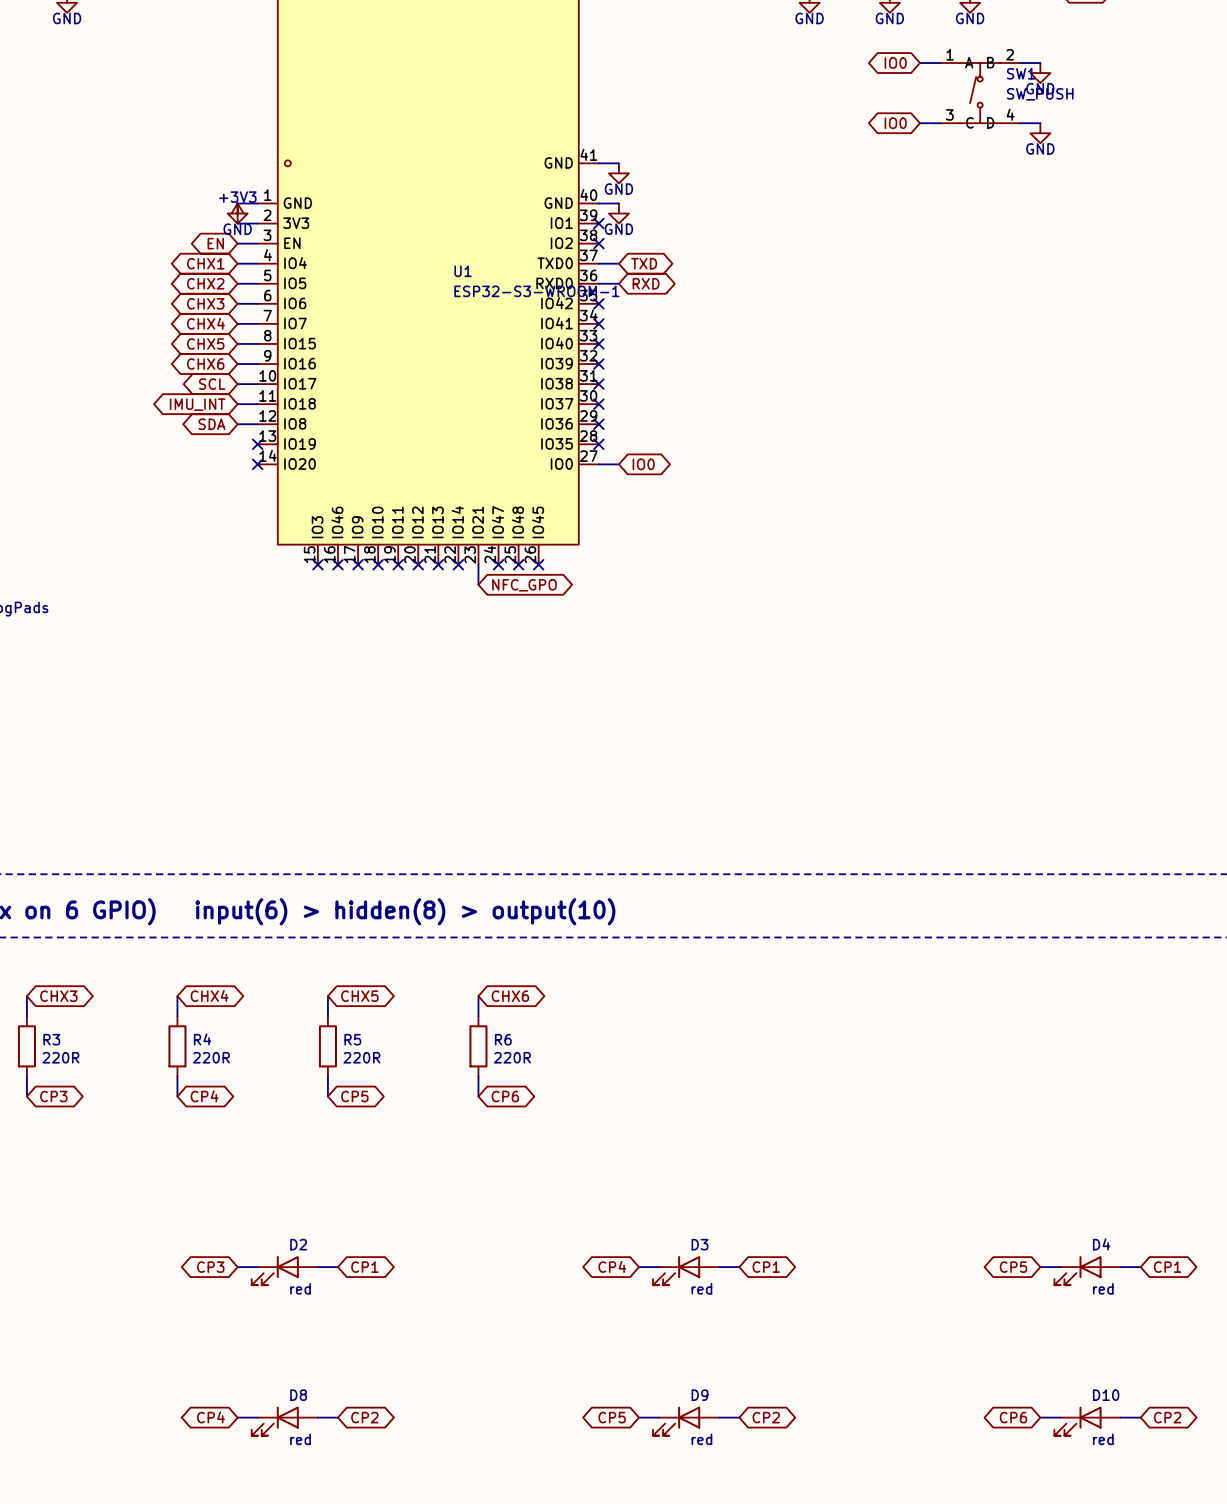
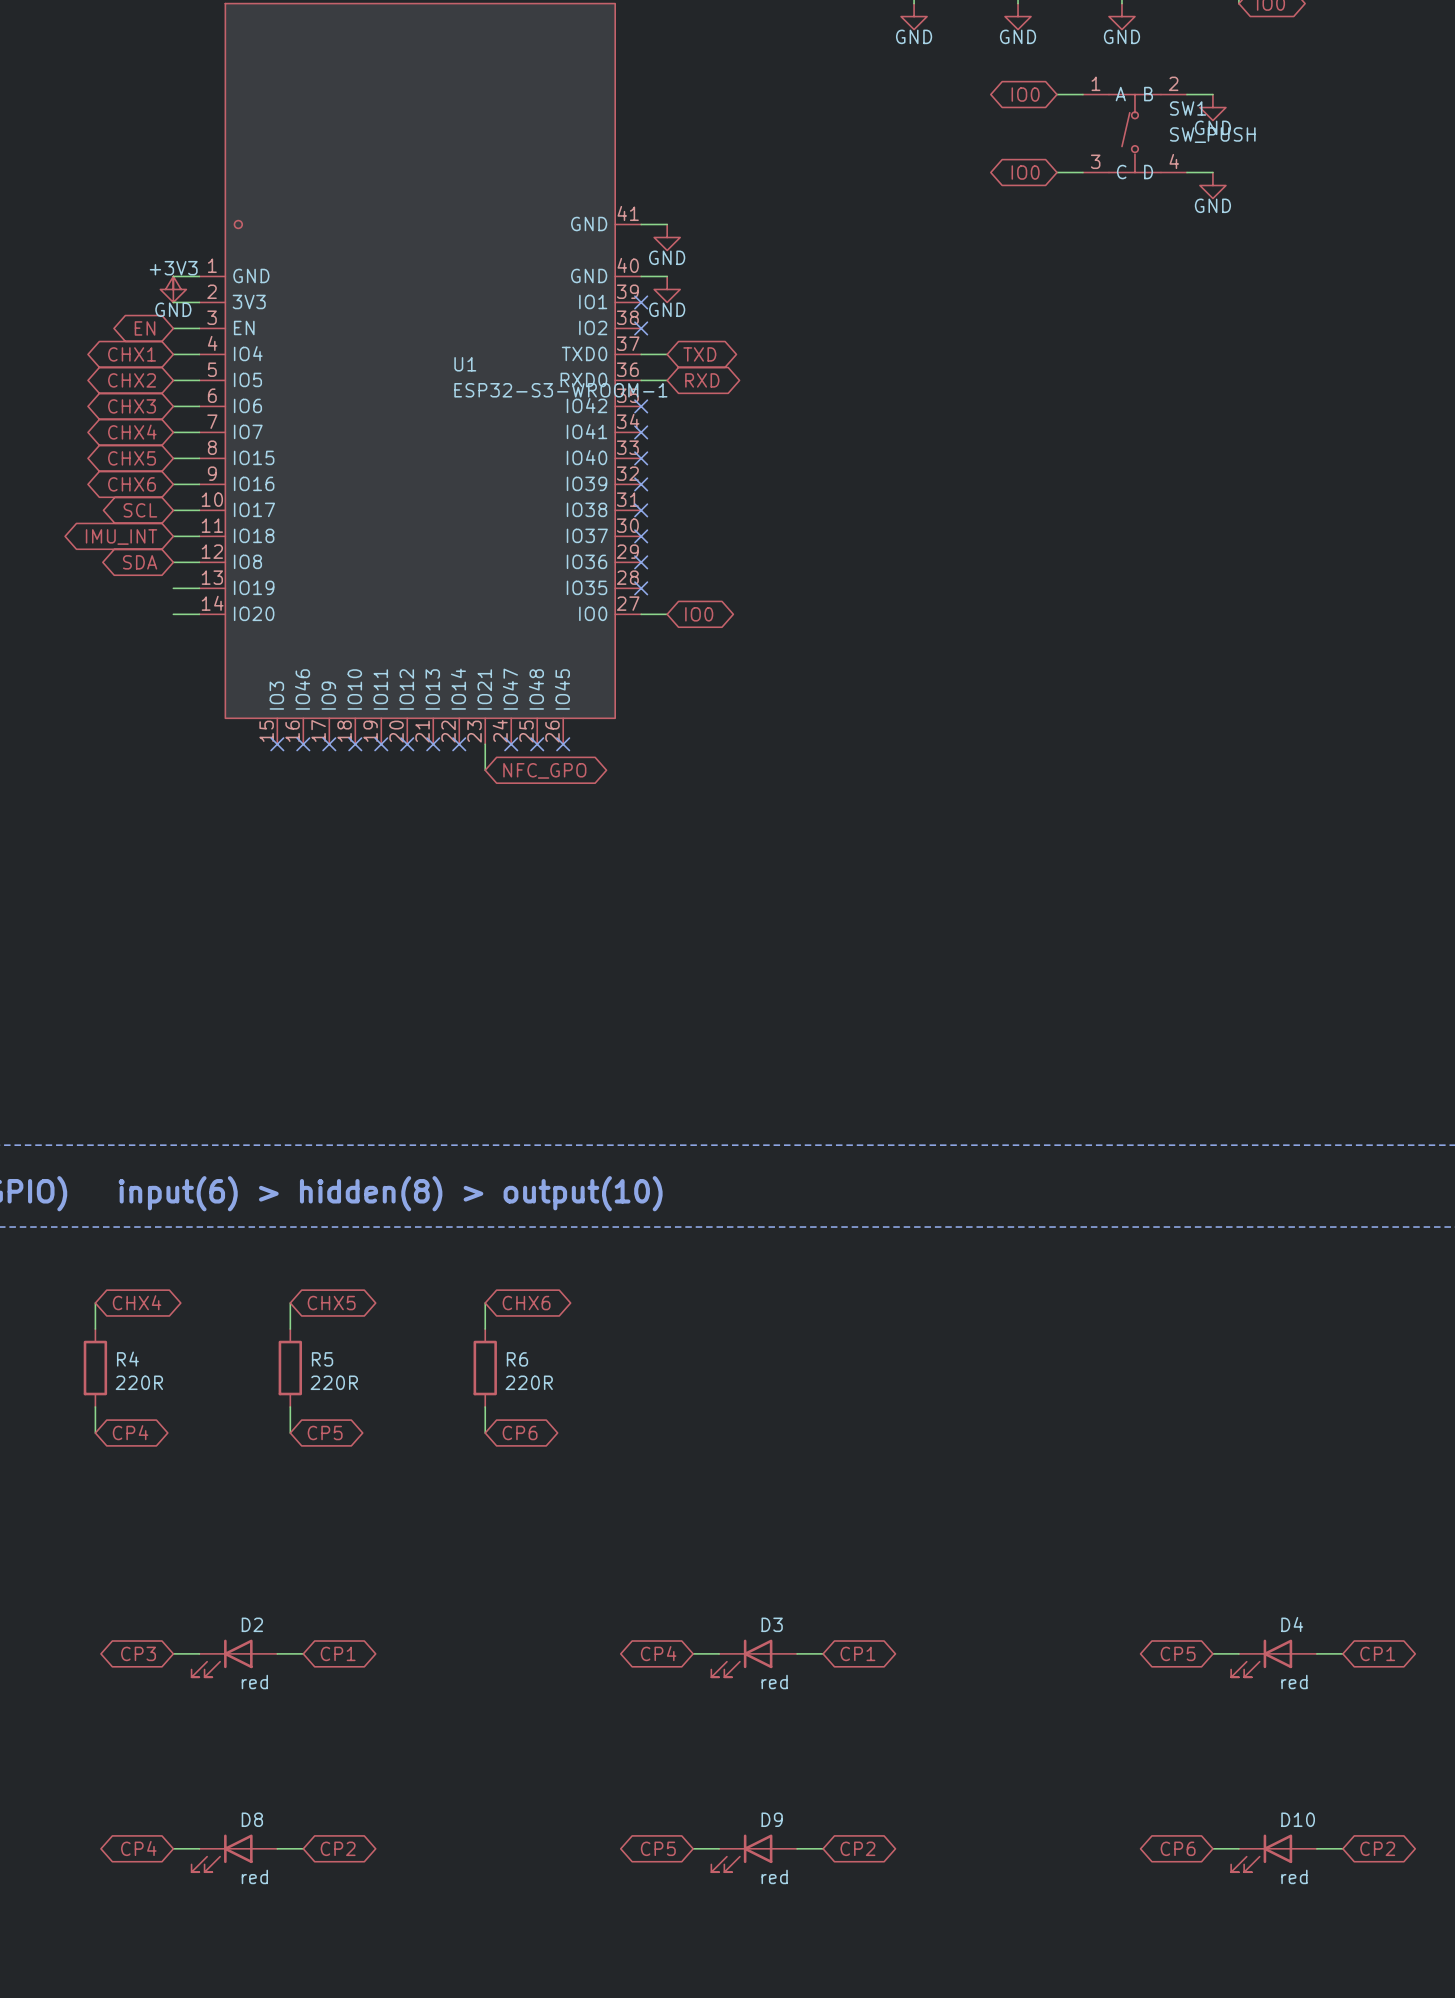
wire: none -> (173, 588) (199, 588)
no-connect mark: (257, 444) -> none
wire: none -> (173, 614) (199, 614)
no-connect mark: (257, 464) -> none

